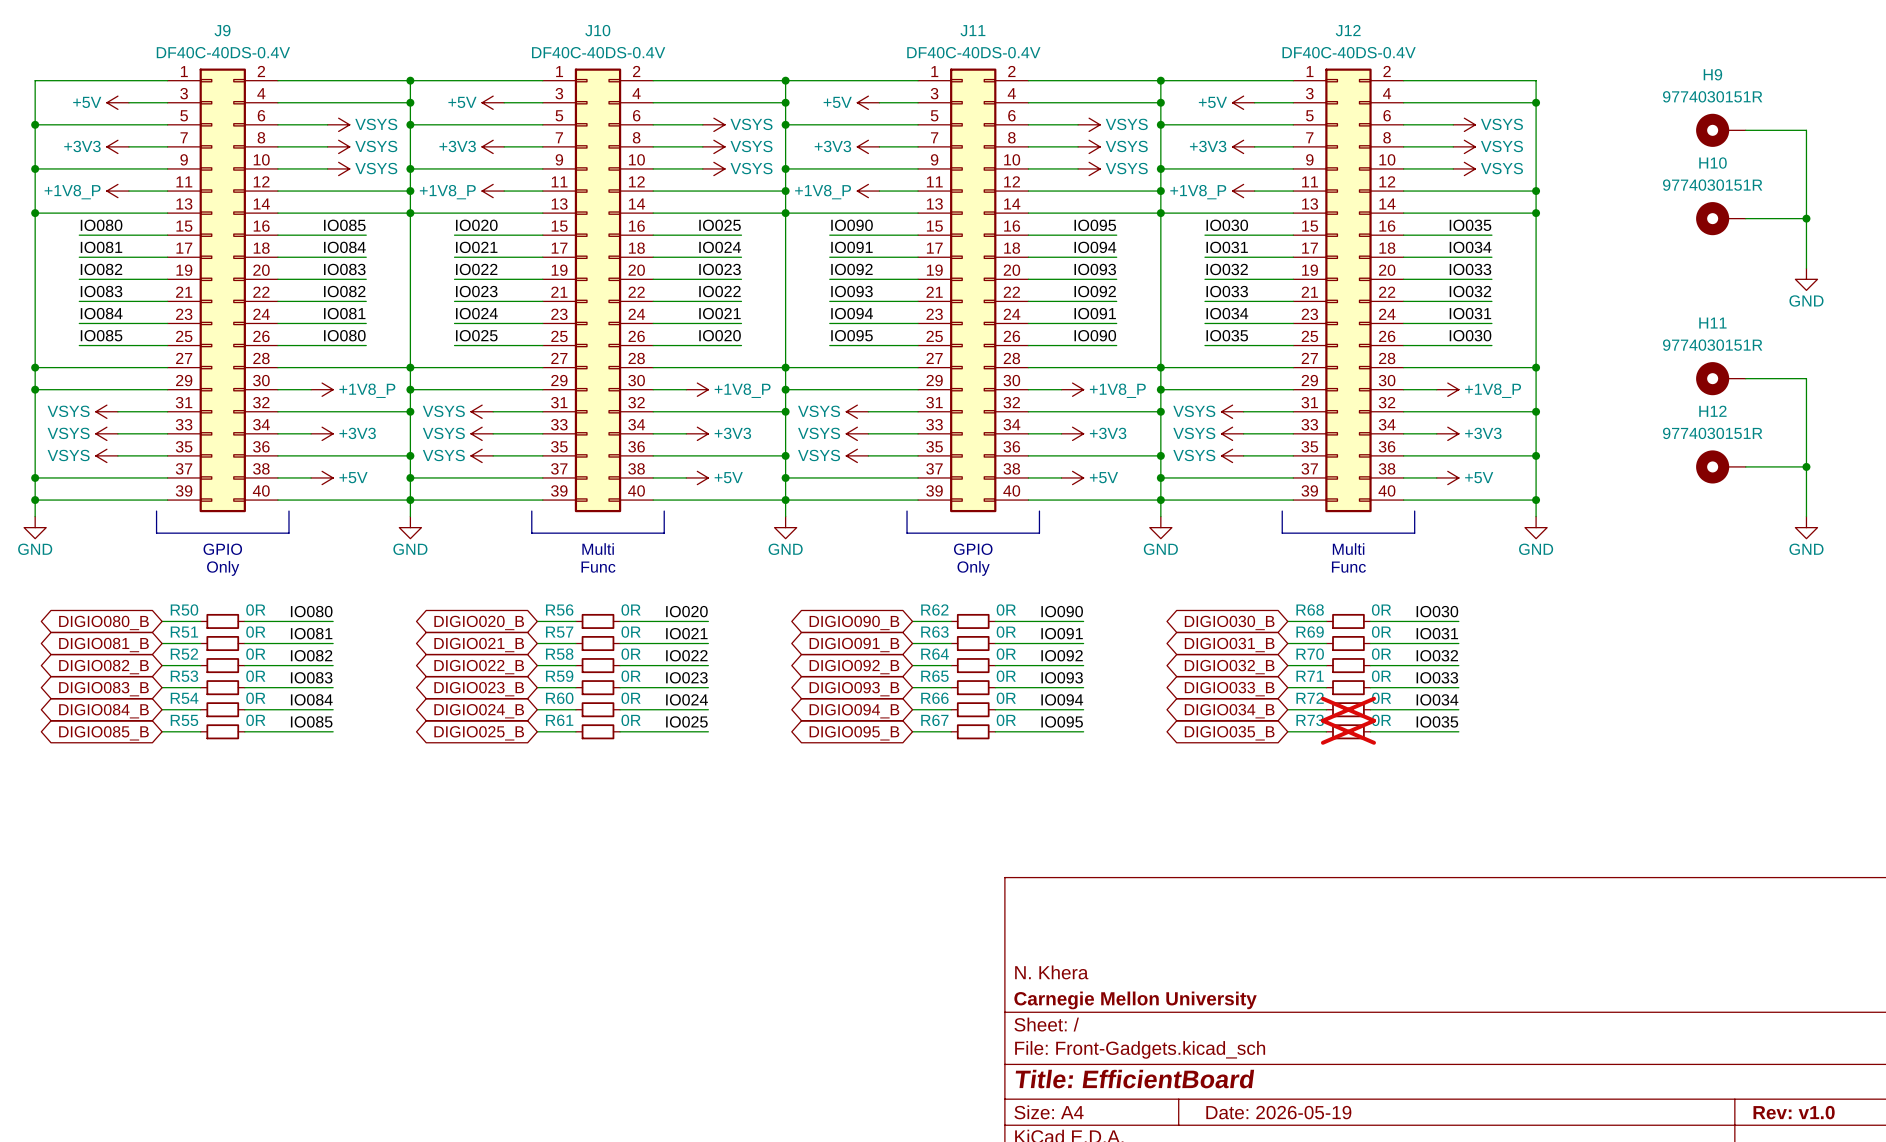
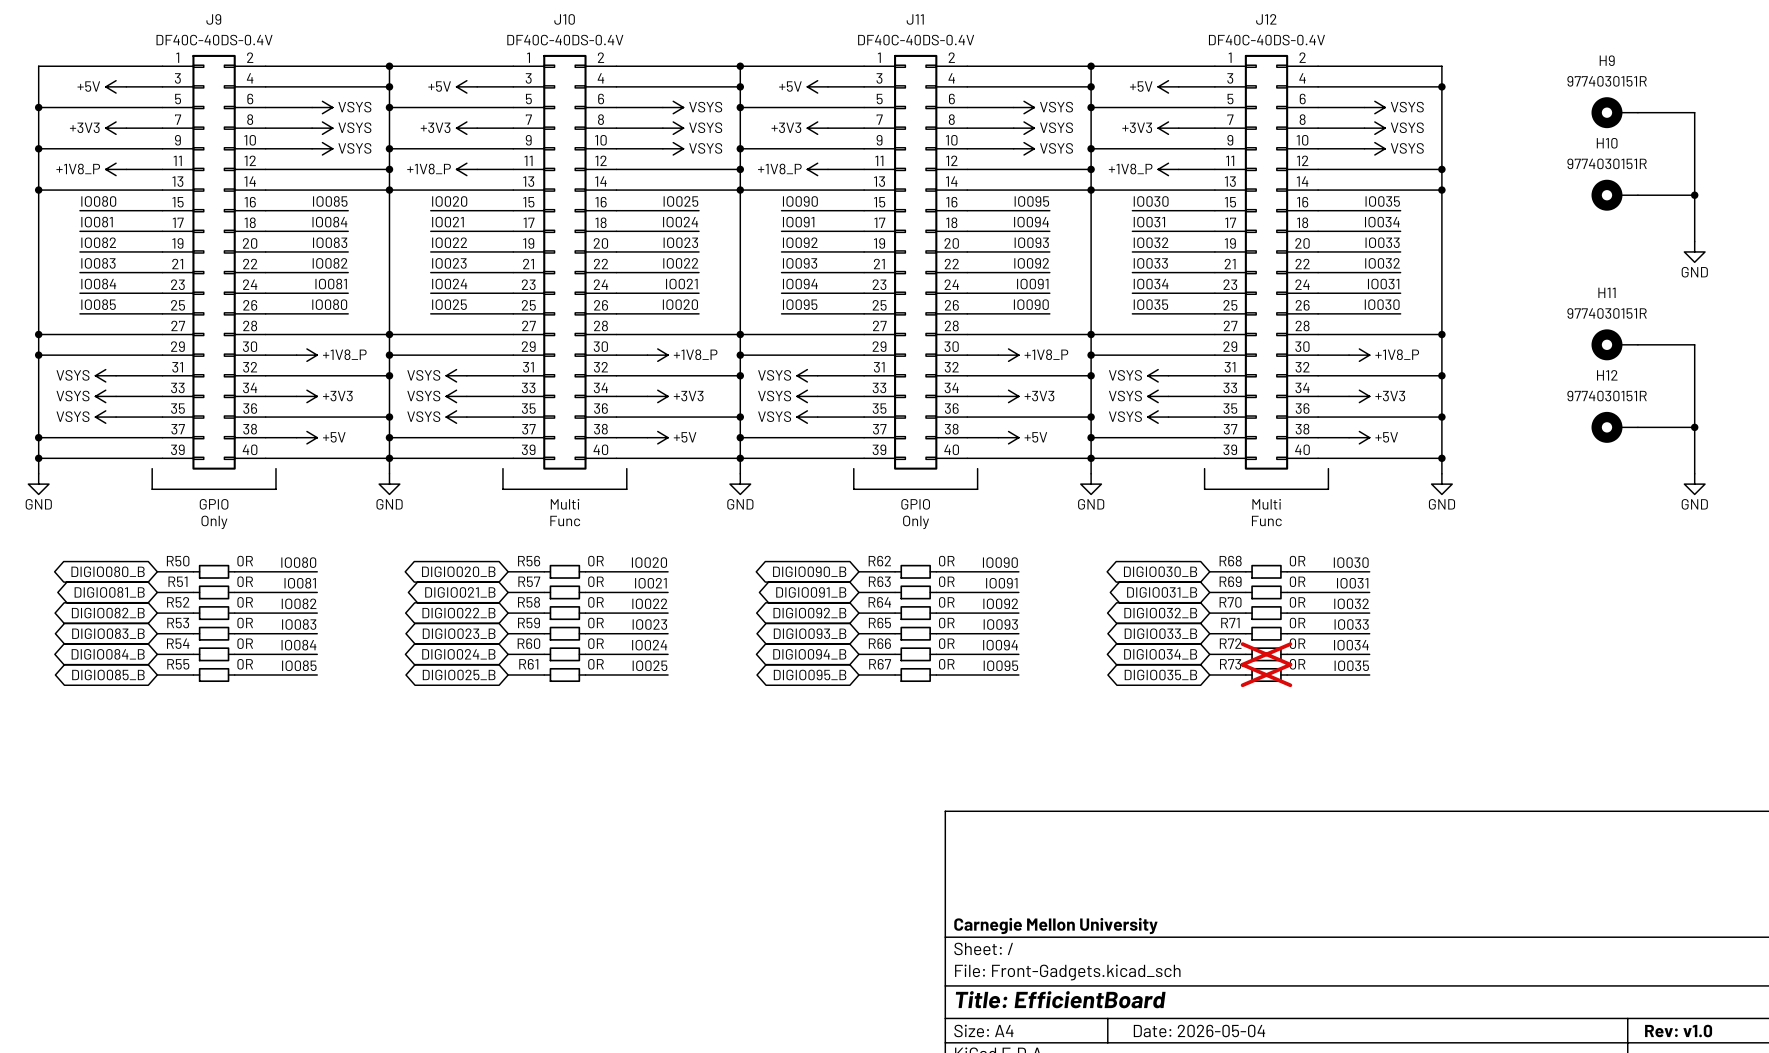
title block: N. Khera (1051, 972) -> none
title block: Date: 2026-05-19 (1278, 1112) -> Date: 2026-05-04 (1199, 1031)

